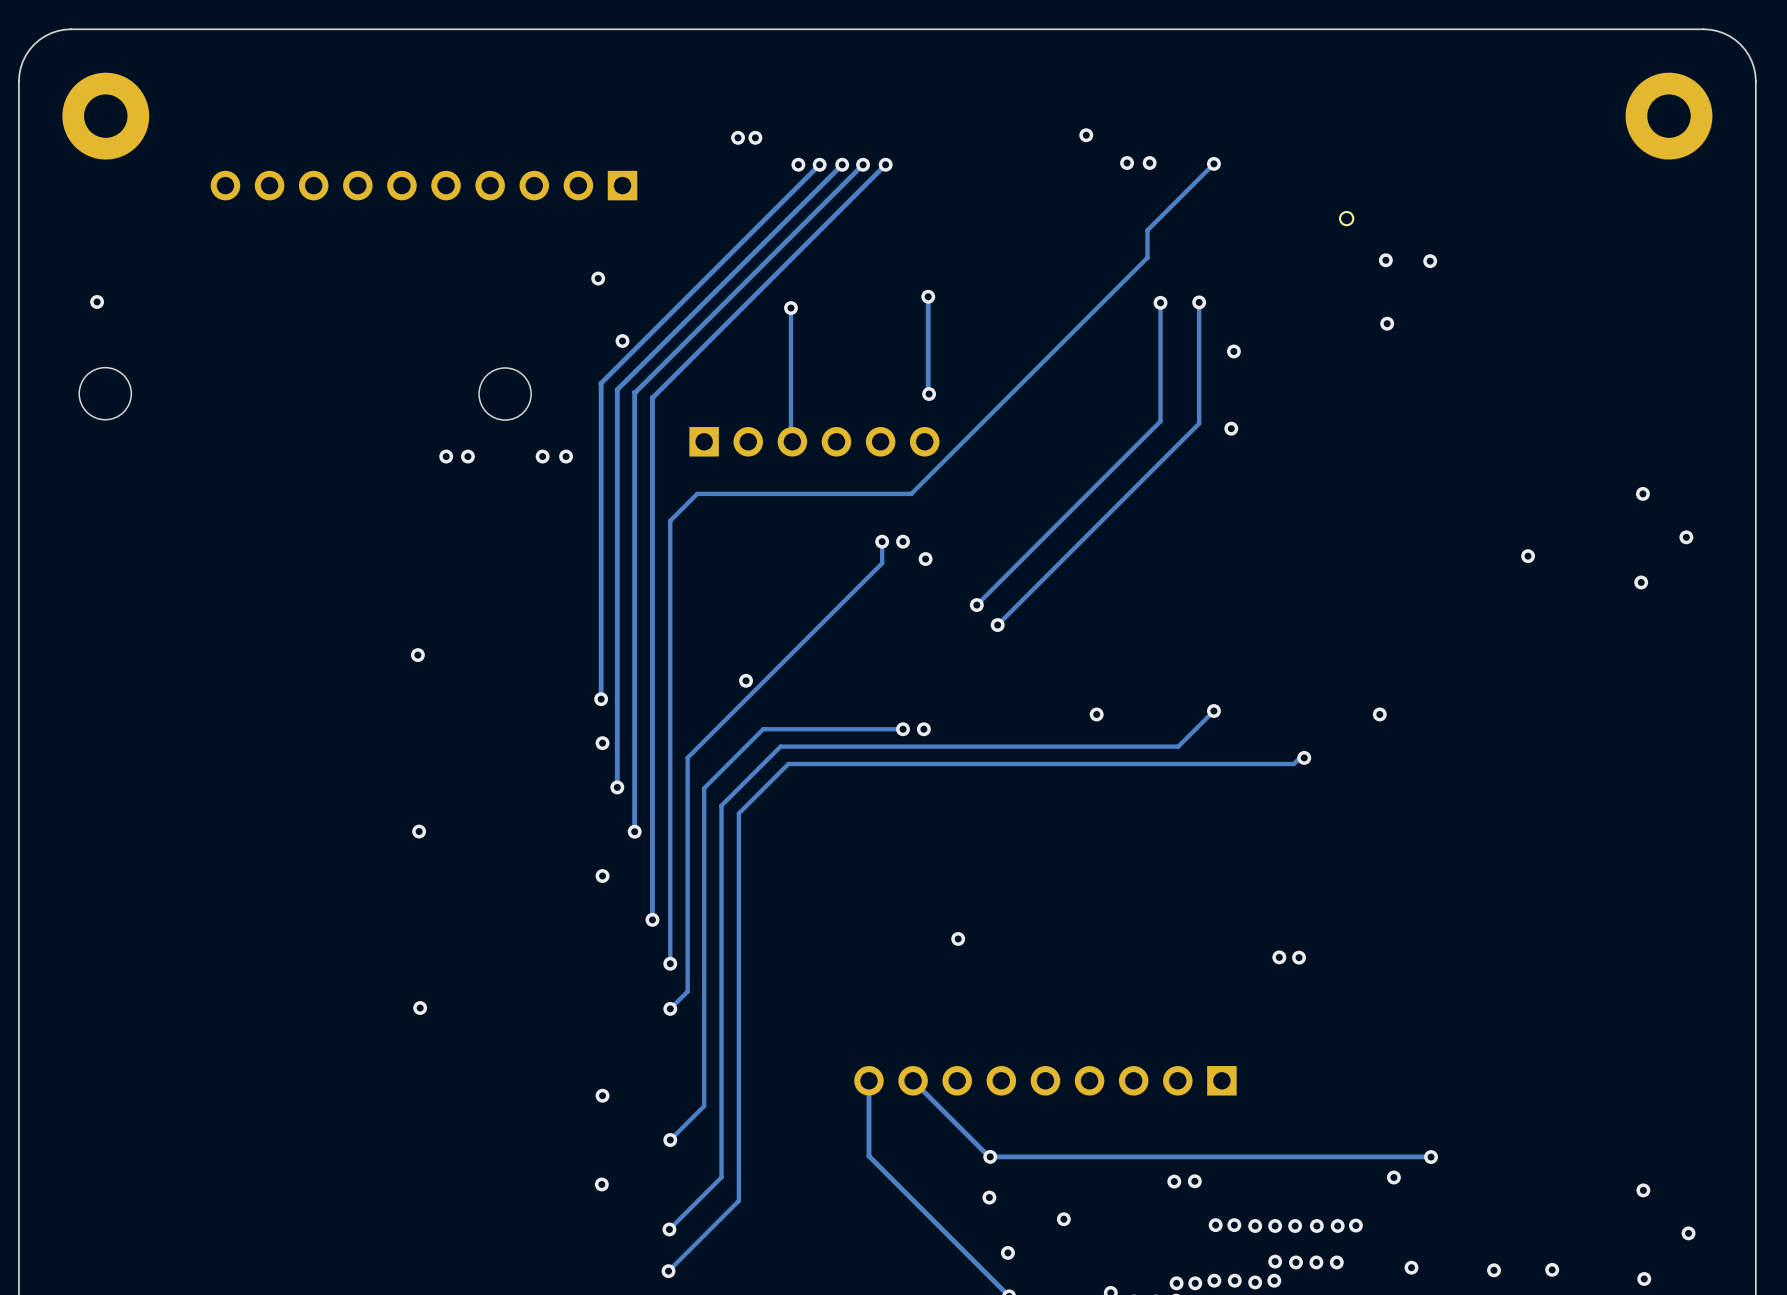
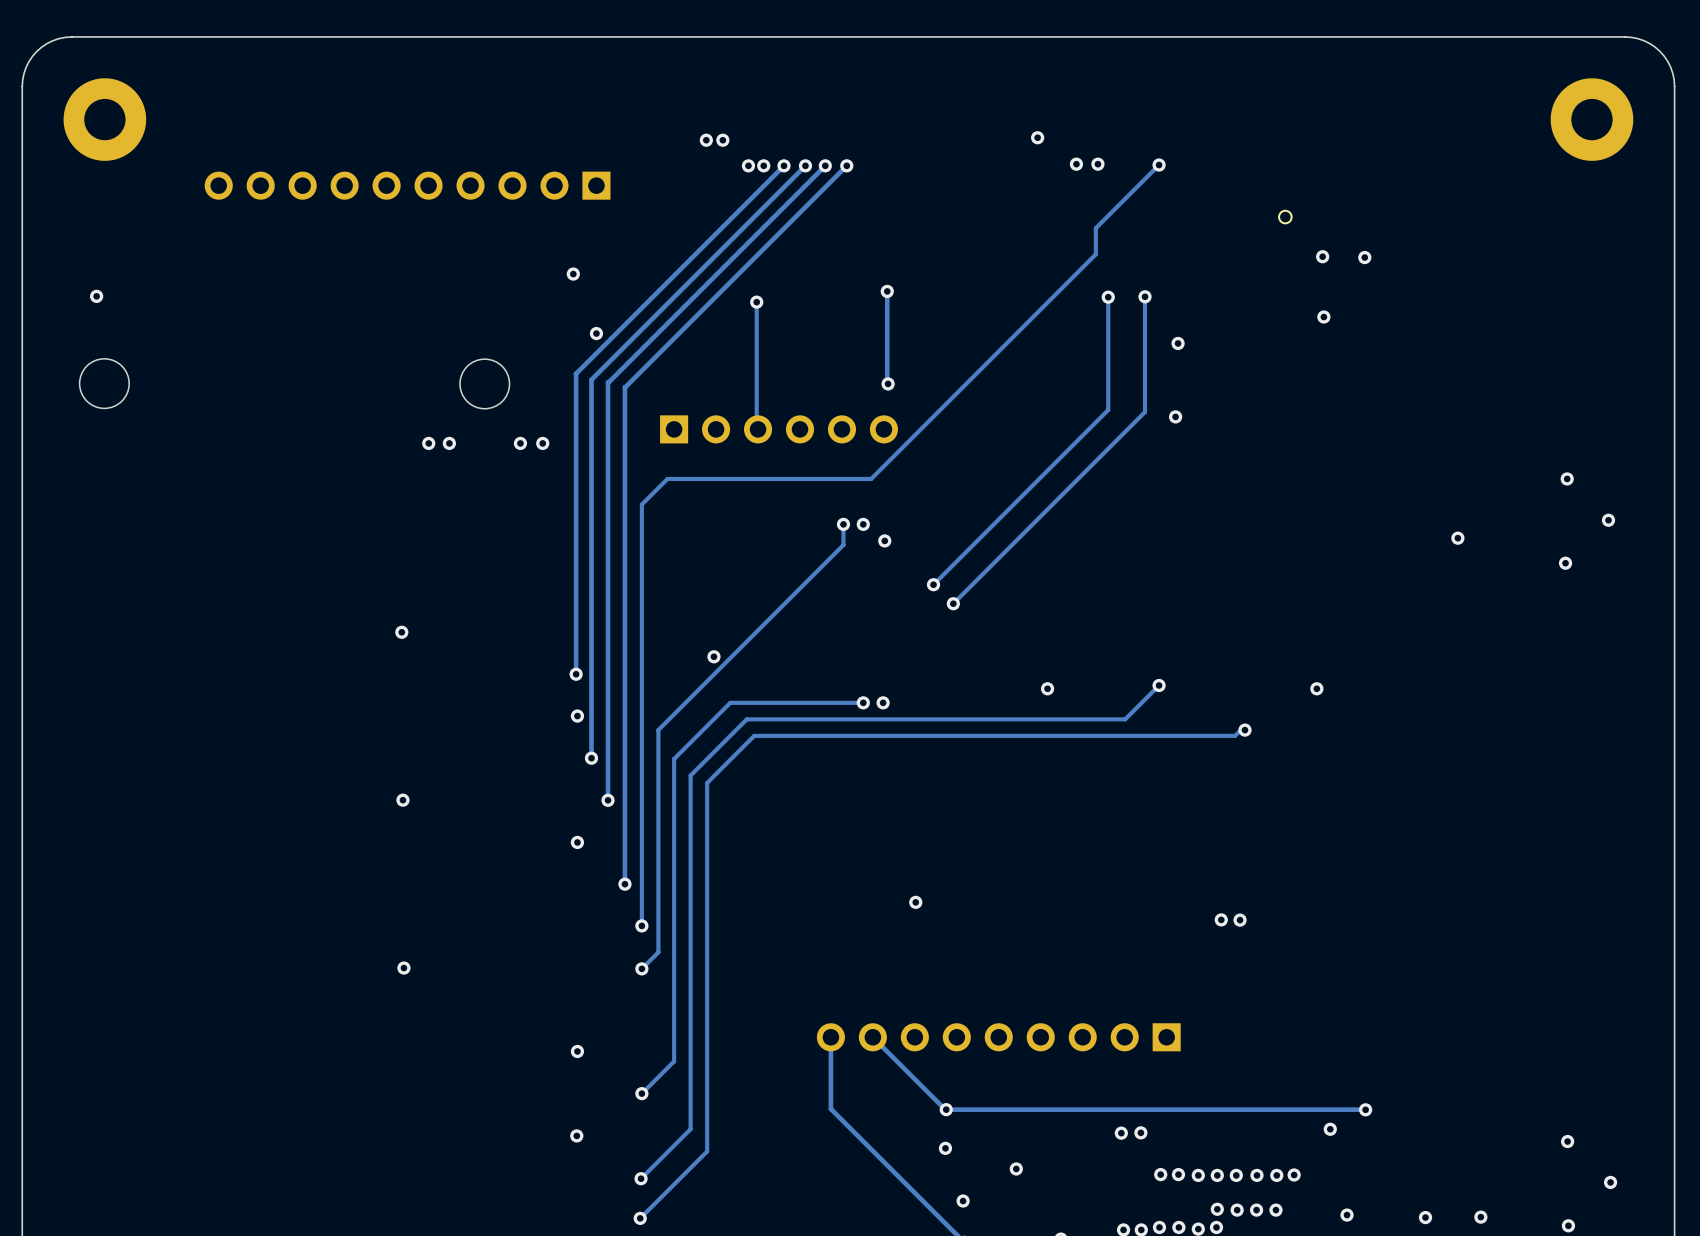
via: none -> (748, 165)

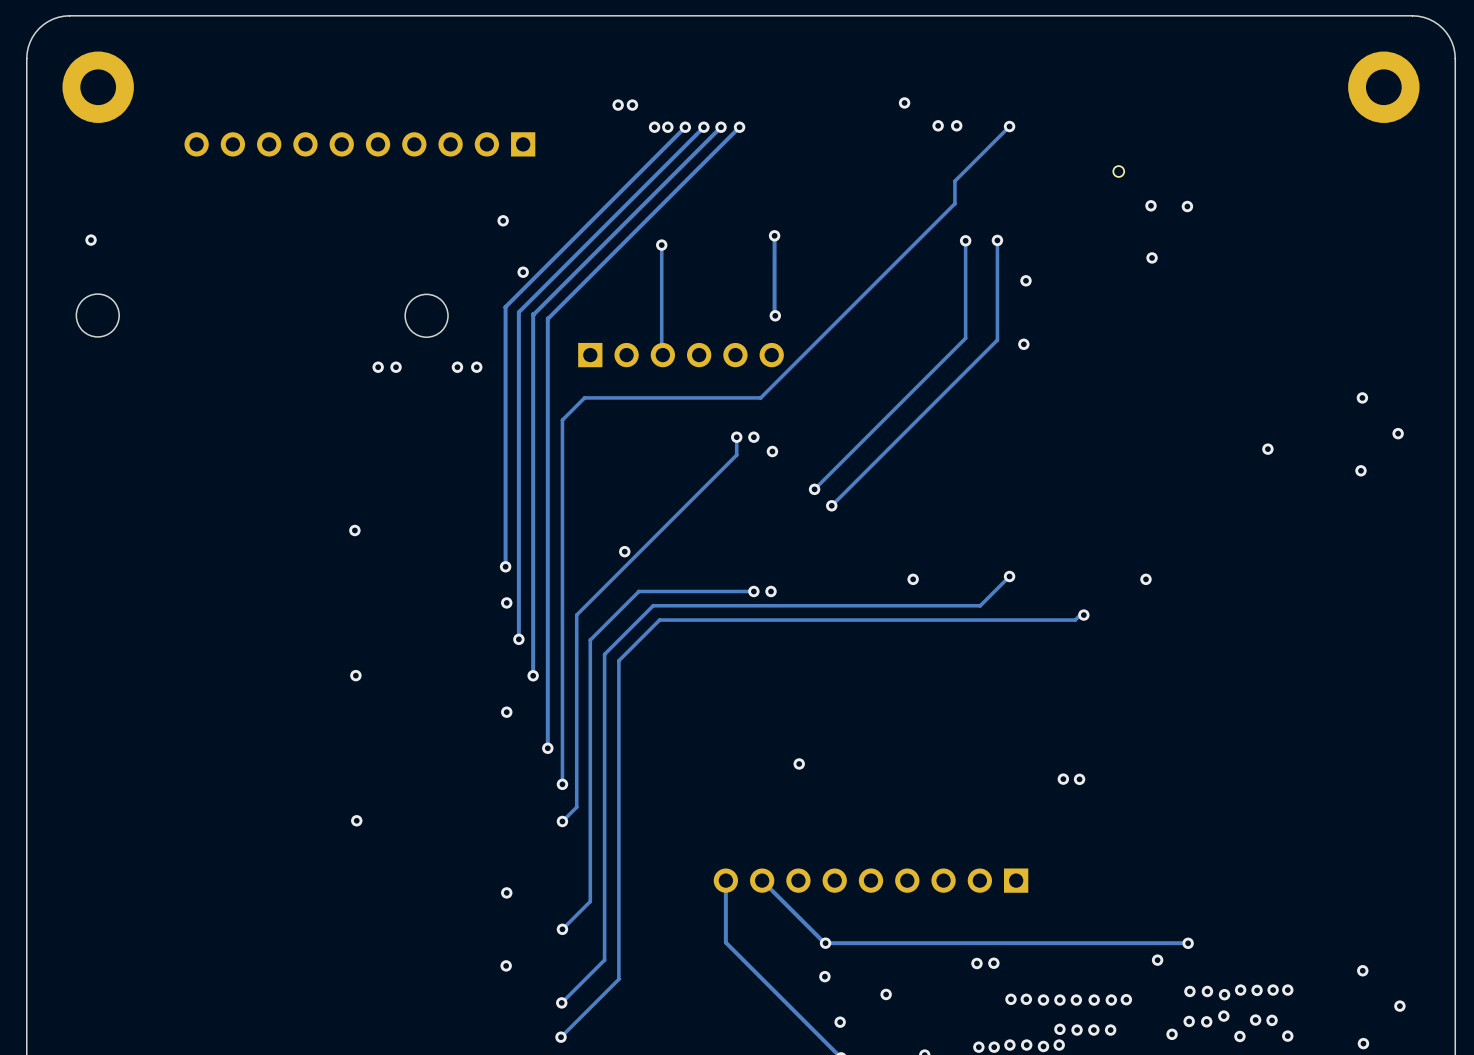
via: none -> (1240, 990)
via: none -> (1273, 990)
via: none -> (1287, 990)
via: none -> (1257, 990)
via: none -> (1189, 991)
via: none -> (1207, 991)
via: none -> (1224, 994)
via: none -> (1223, 1016)
via: none -> (1255, 1020)
via: none -> (1272, 1020)
via: none -> (1189, 1021)
via: none -> (1206, 1021)

